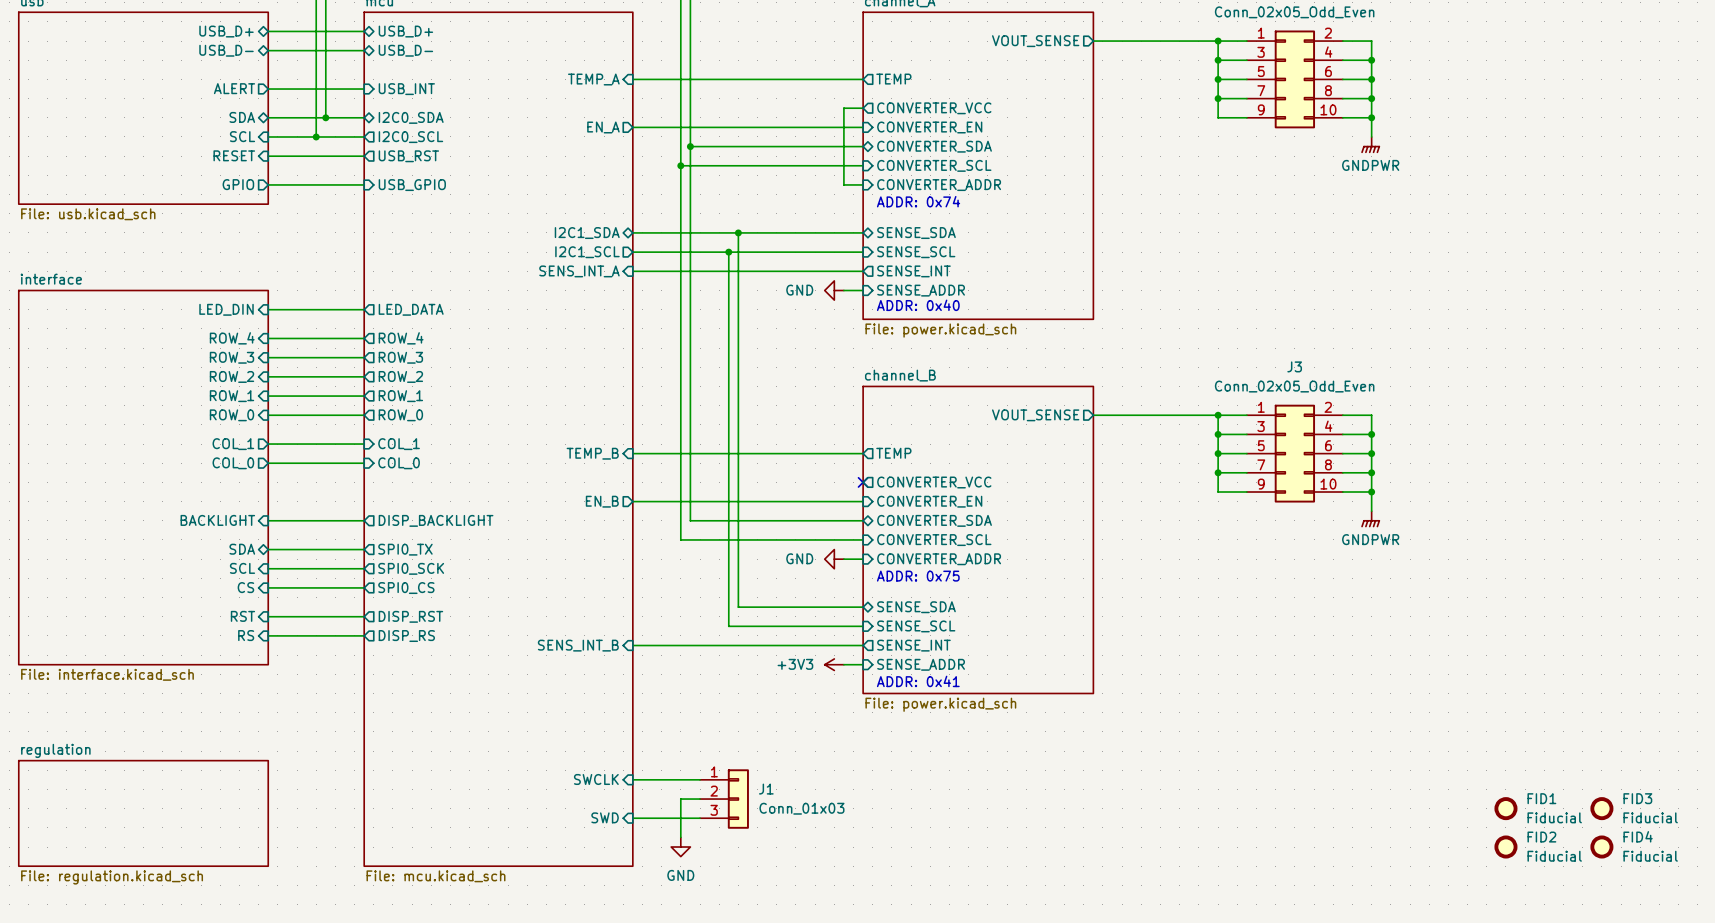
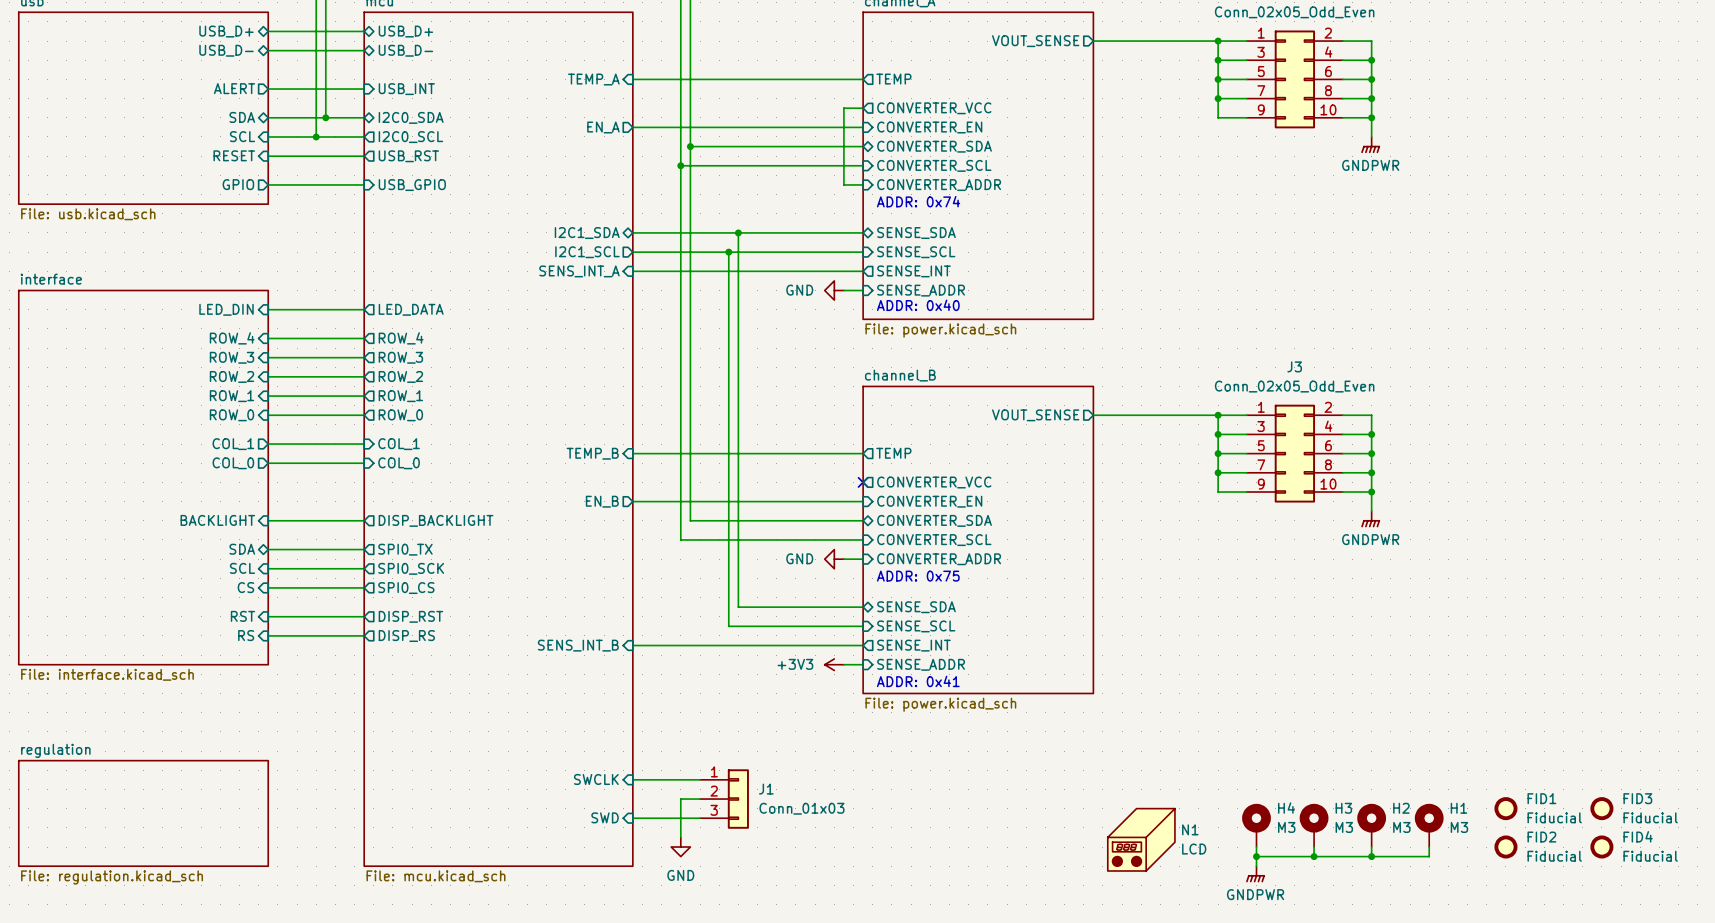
H4: none -> M3 (1256, 825)
H3: none -> M3 (1314, 825)
H2: none -> M3 (1371, 825)
H1: none -> M3 (1429, 825)
N1: none -> LCD (1141, 839)
wire: none -> (1256, 847) (1256, 866)
wire: none -> (1314, 847) (1314, 856)
wire: none -> (1371, 847) (1371, 856)
wire: none -> (1429, 847) (1429, 856) (1256, 856)
junction: none -> (1256, 856)
junction: none -> (1314, 856)
junction: none -> (1371, 856)
power symbol: none -> GNDPWR (1255, 874)

